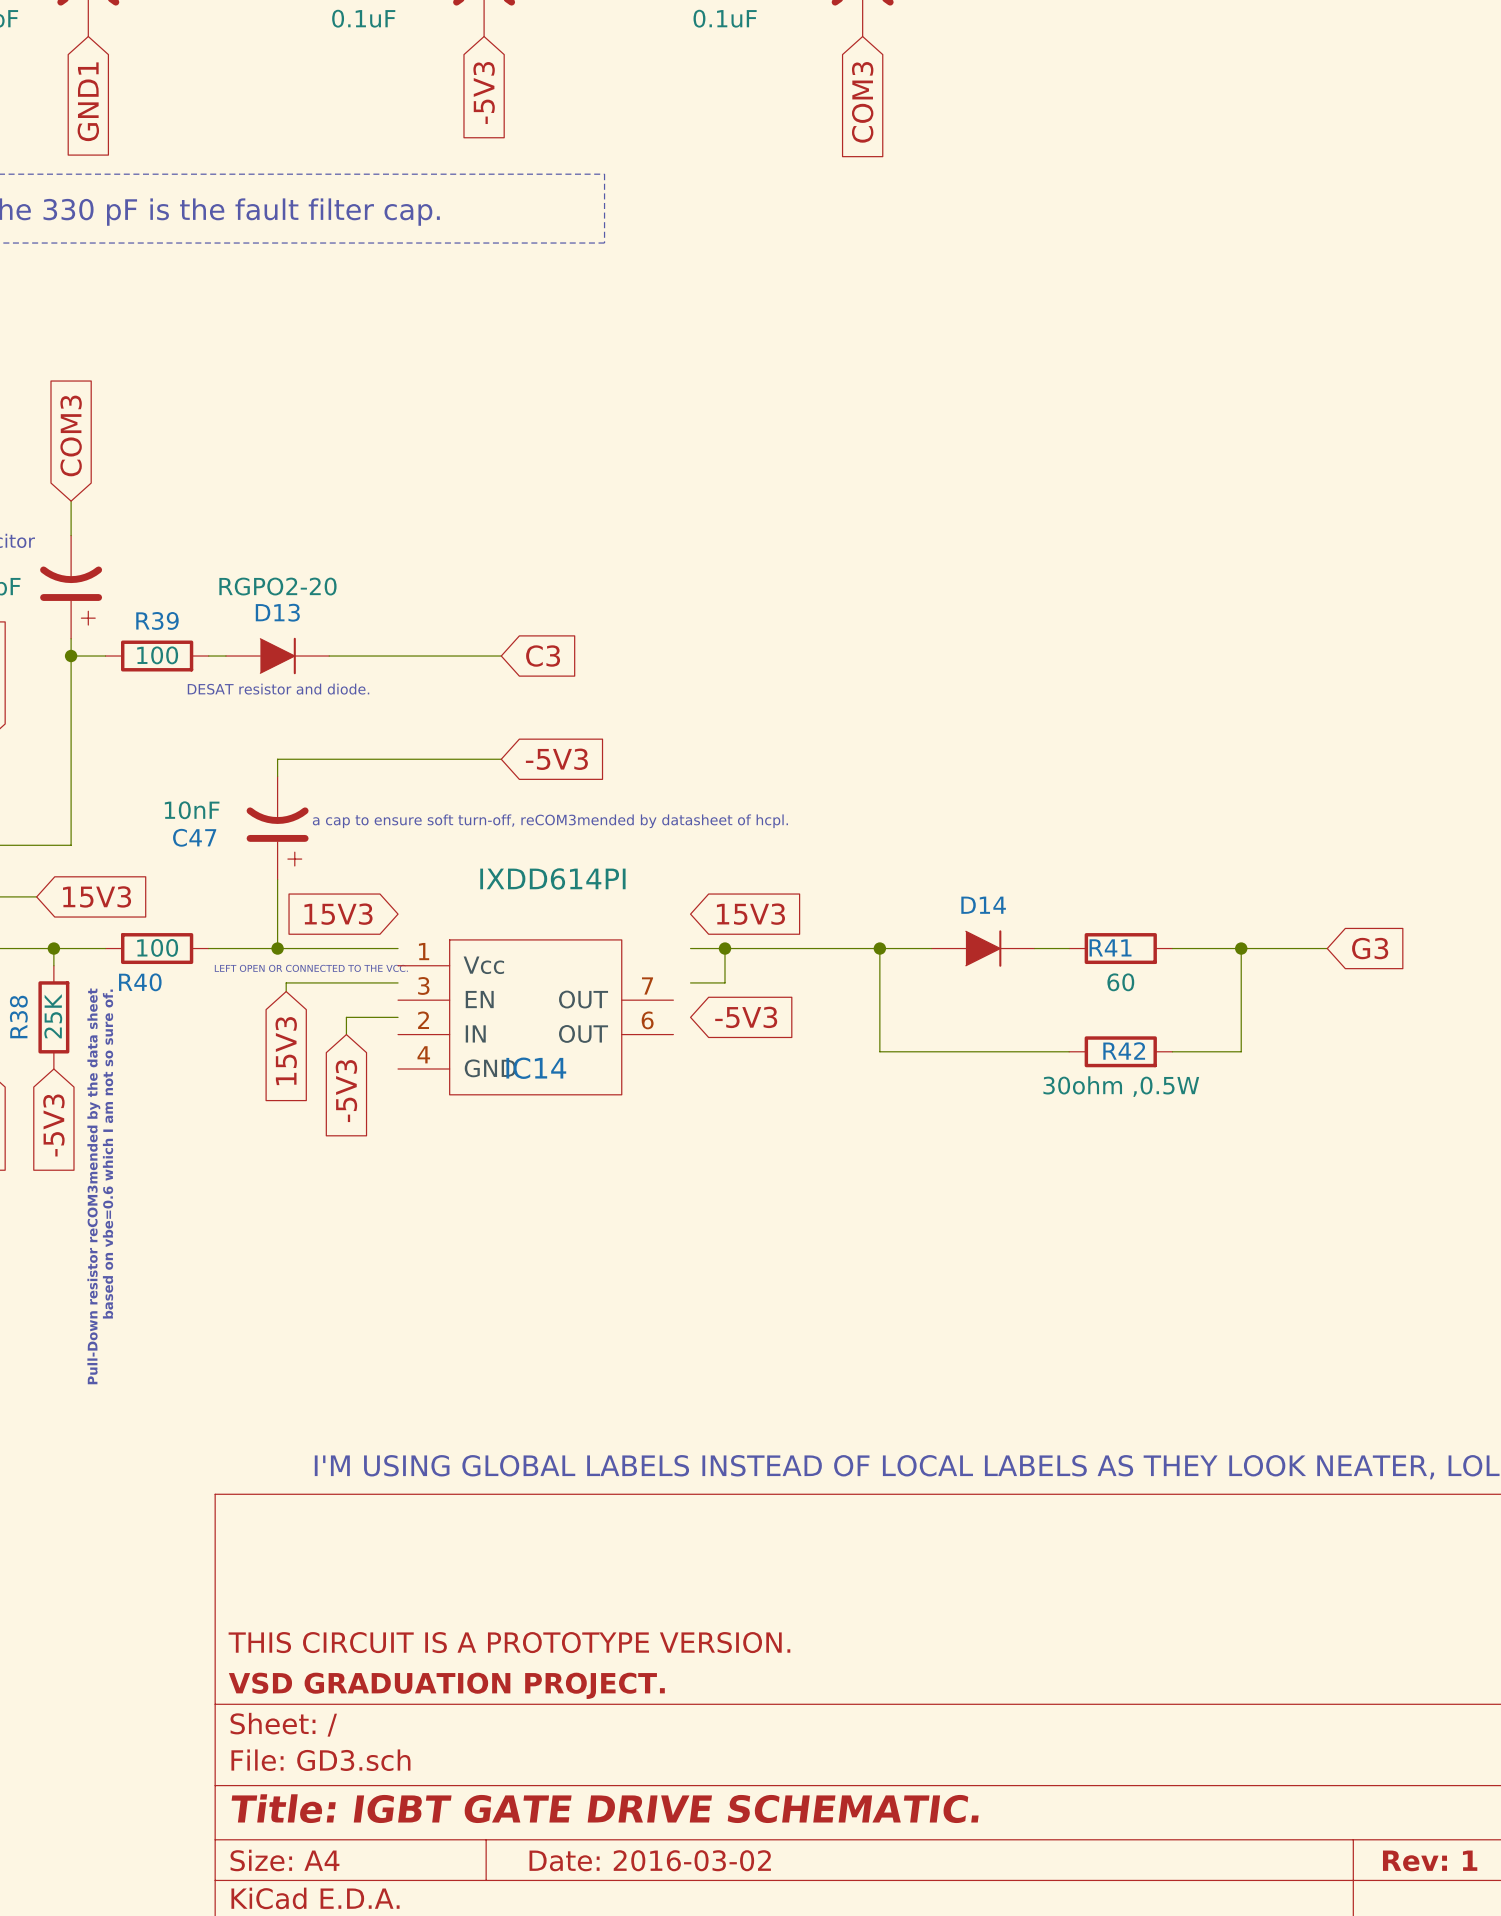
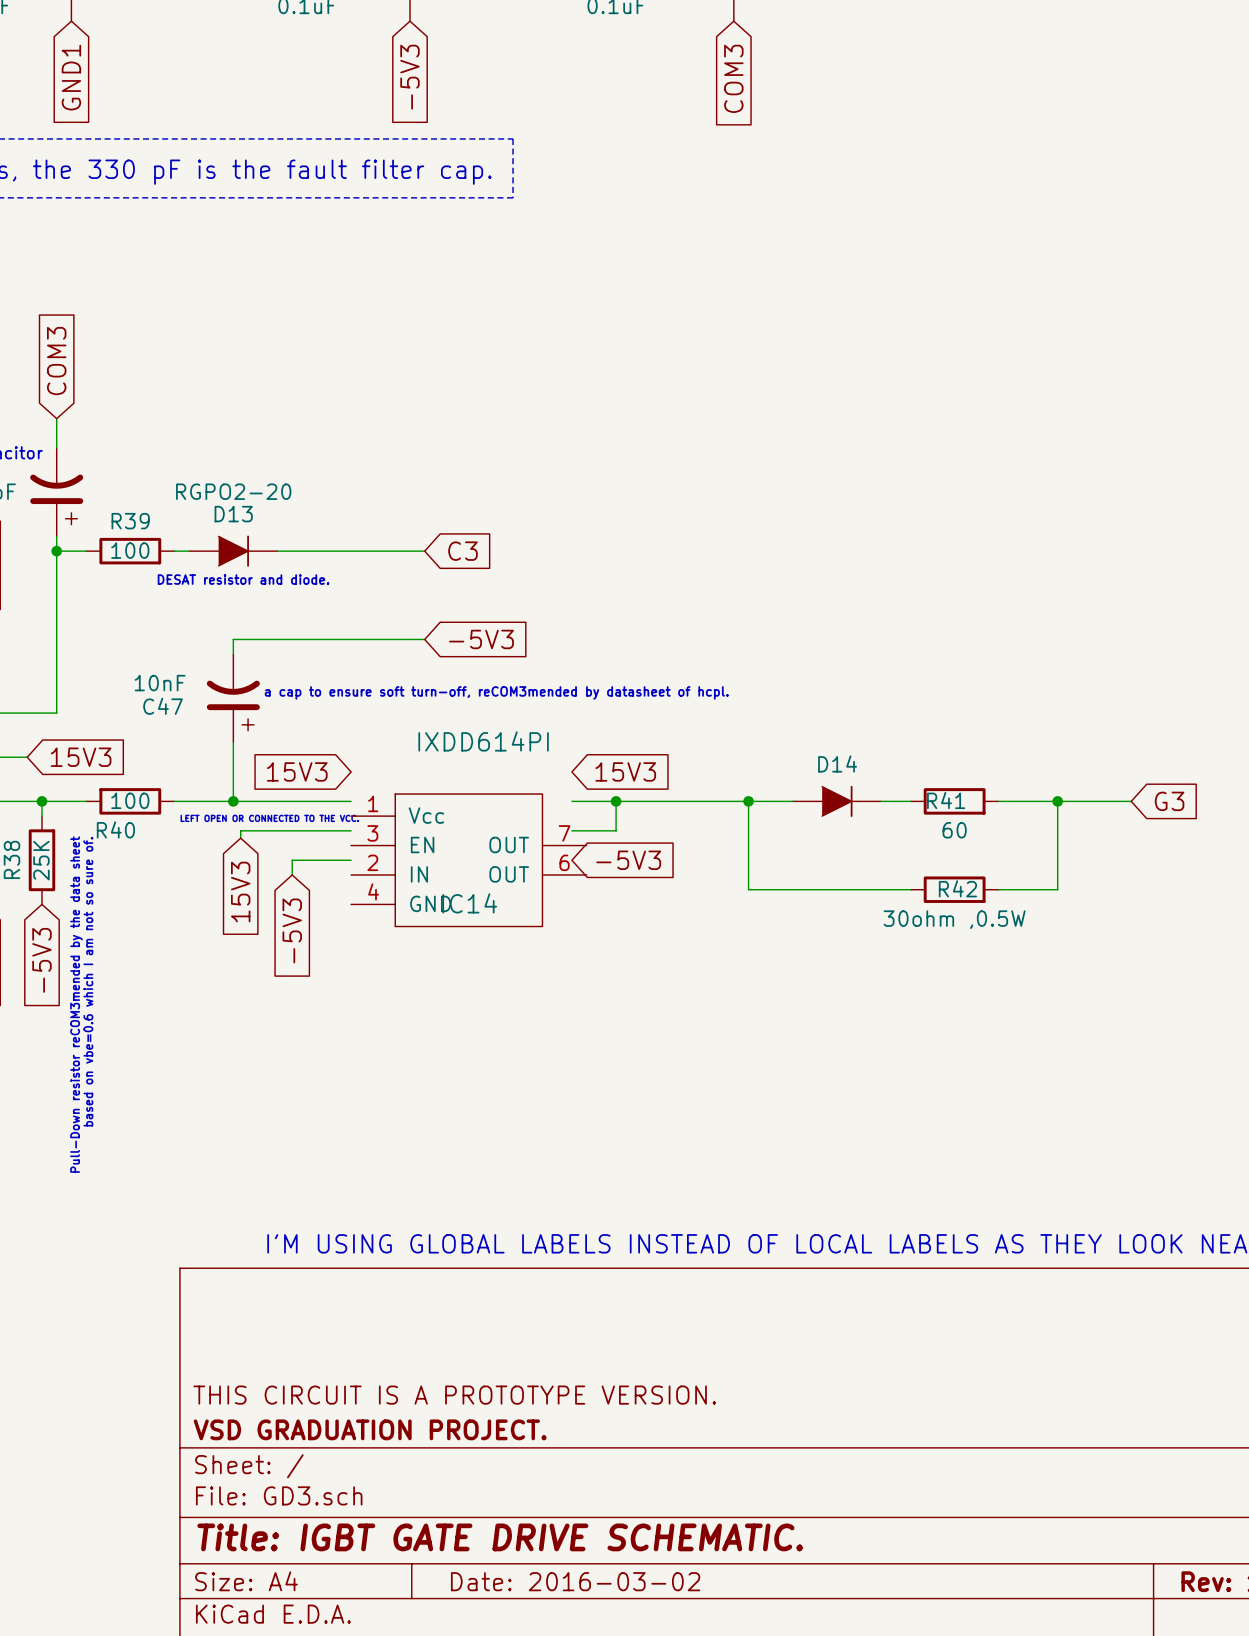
global label position: 15V3 (338, 914) -> 15V3 (297, 771)
global label position: 15V3 (750, 914) -> 15V3 (625, 771)
wire: none -> (336, 801) (351, 801)
wire: none -> (571, 801) (586, 801)
wire: none -> (336, 830) (351, 830)
wire: none -> (571, 830) (586, 830)
wire: none -> (336, 860) (351, 860)
IC14 position: (535, 1017) -> (468, 860)
global label position: -5V3 (746, 1017) -> -5V3 (628, 860)

